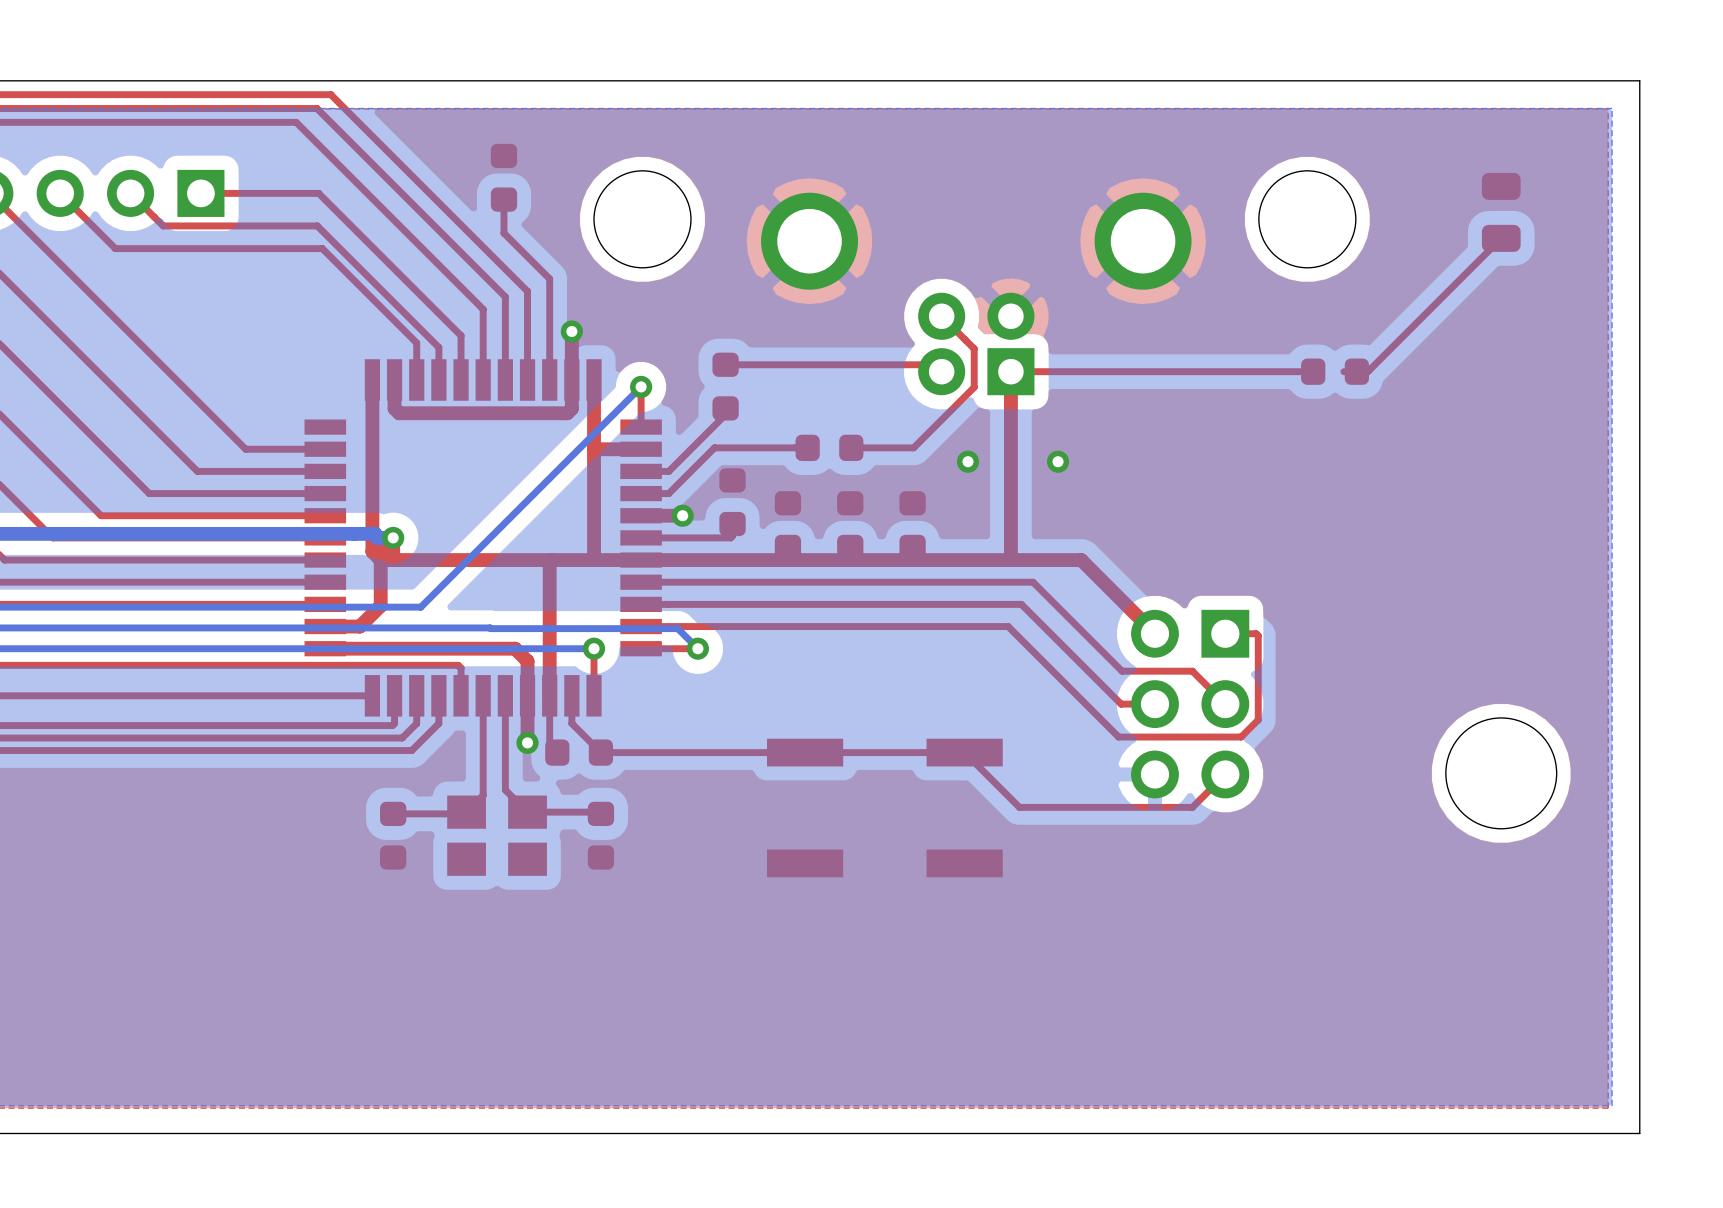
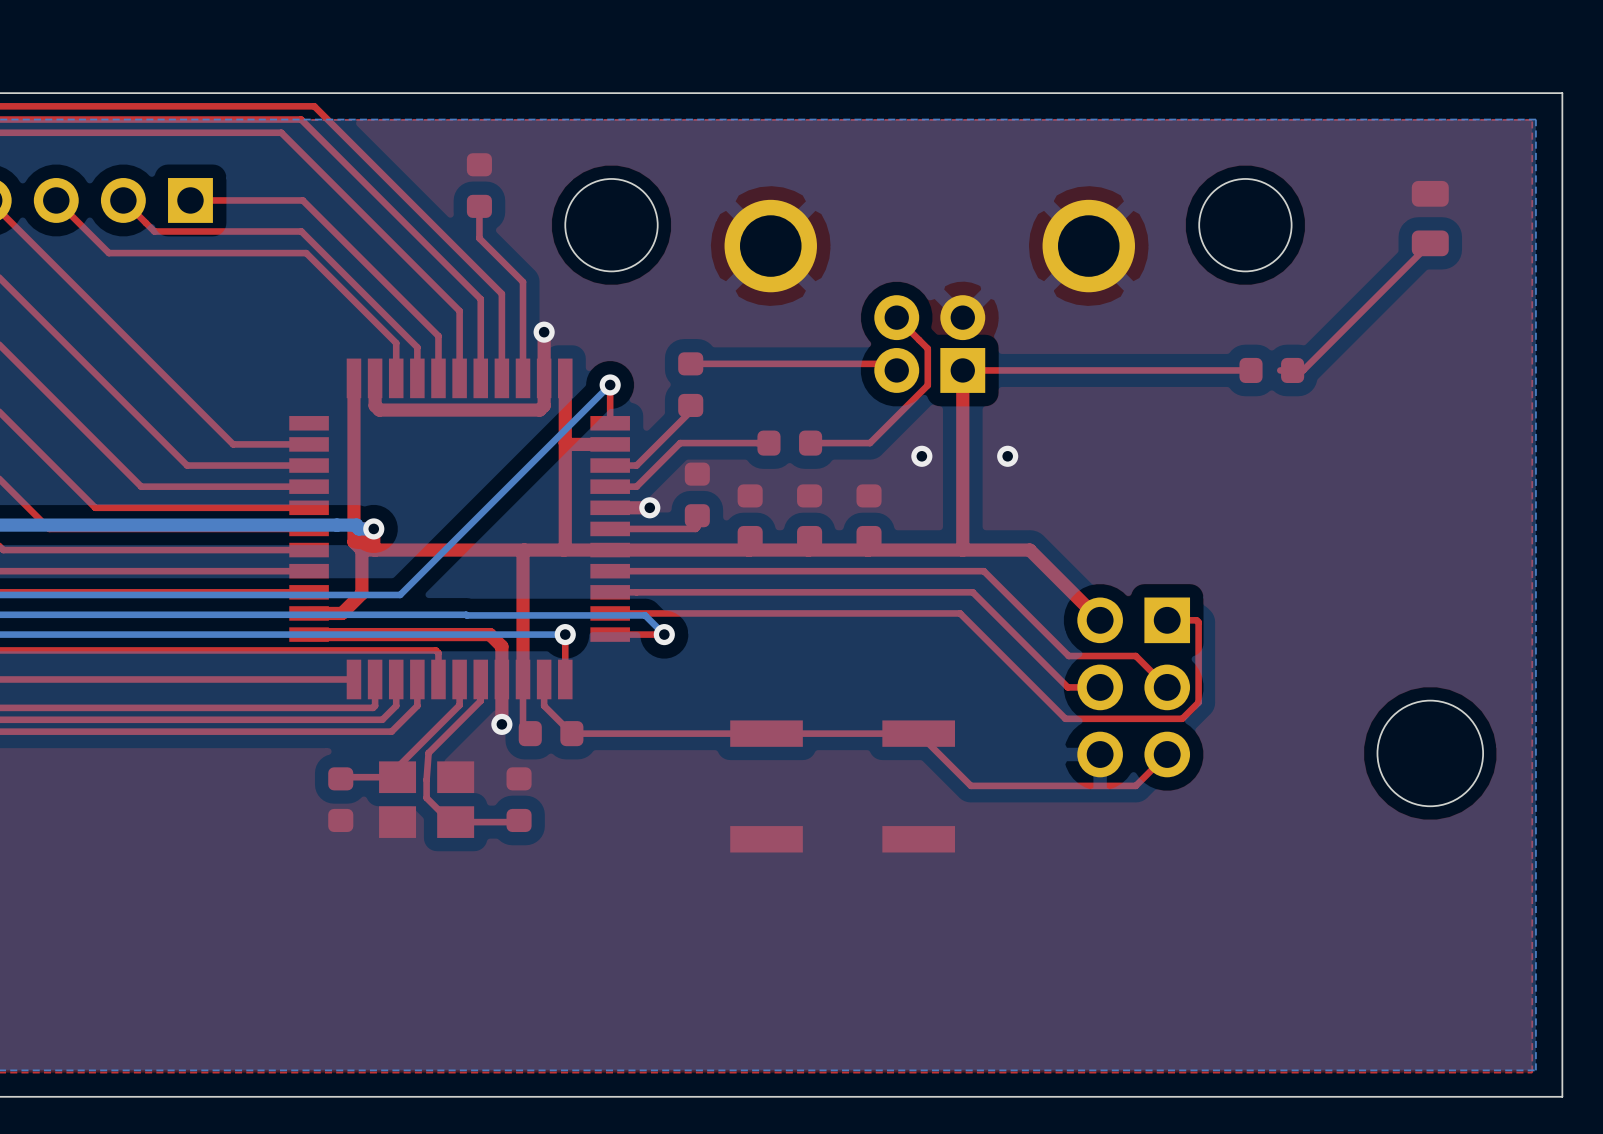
top track: (505, 718) (505, 789) (527, 812) (599, 812) (600, 813) -> (480, 700) (428, 753) (426, 797) (450, 822) (517, 822) (519, 820)
top track: (483, 722) (483, 795) (464, 813) (393, 813) -> (459, 705) (397, 767) (397, 777) (342, 777) (340, 778)
part position: (393, 835) -> (340, 799)
part position: (497, 835) -> (426, 799)
part position: (600, 835) -> (519, 799)

